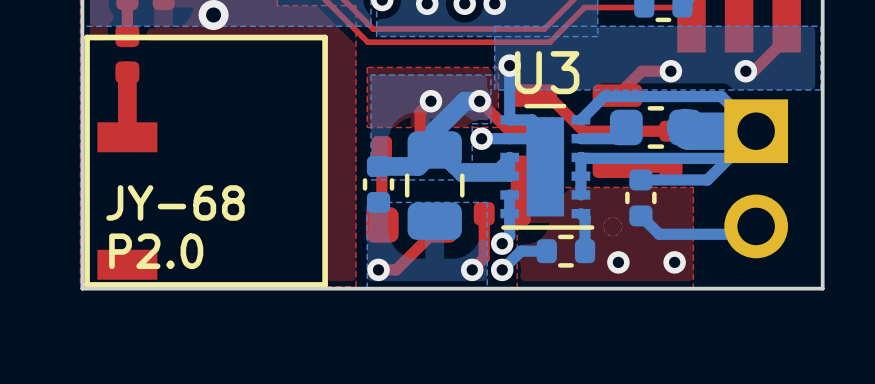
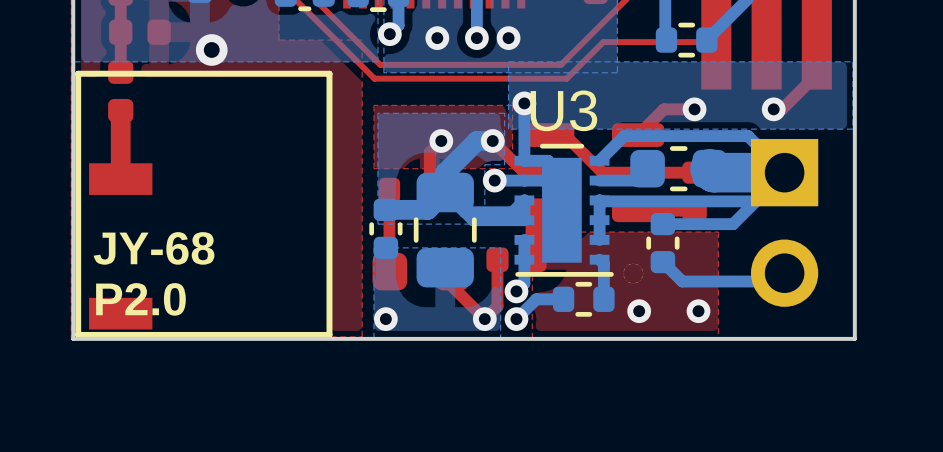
top track: (441, 224) (396, 269) (378, 269) -> (452, 271) (452, 286) (484, 319)

